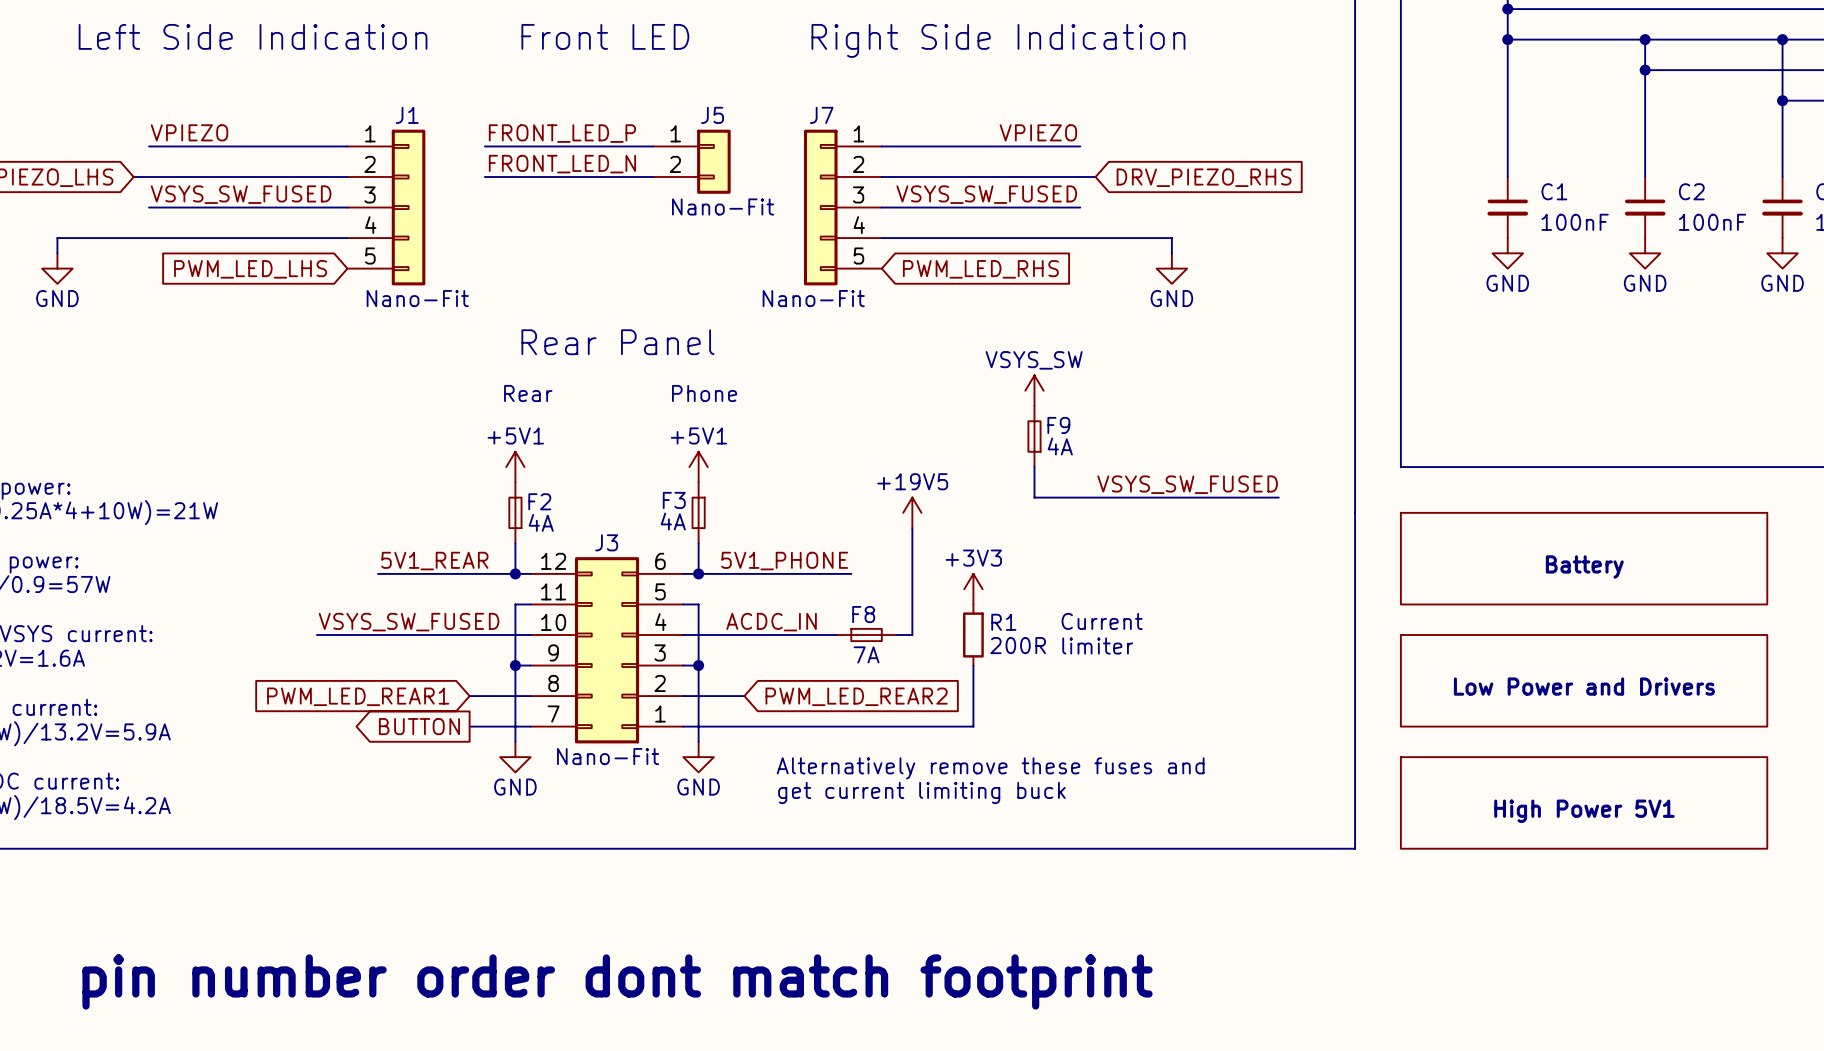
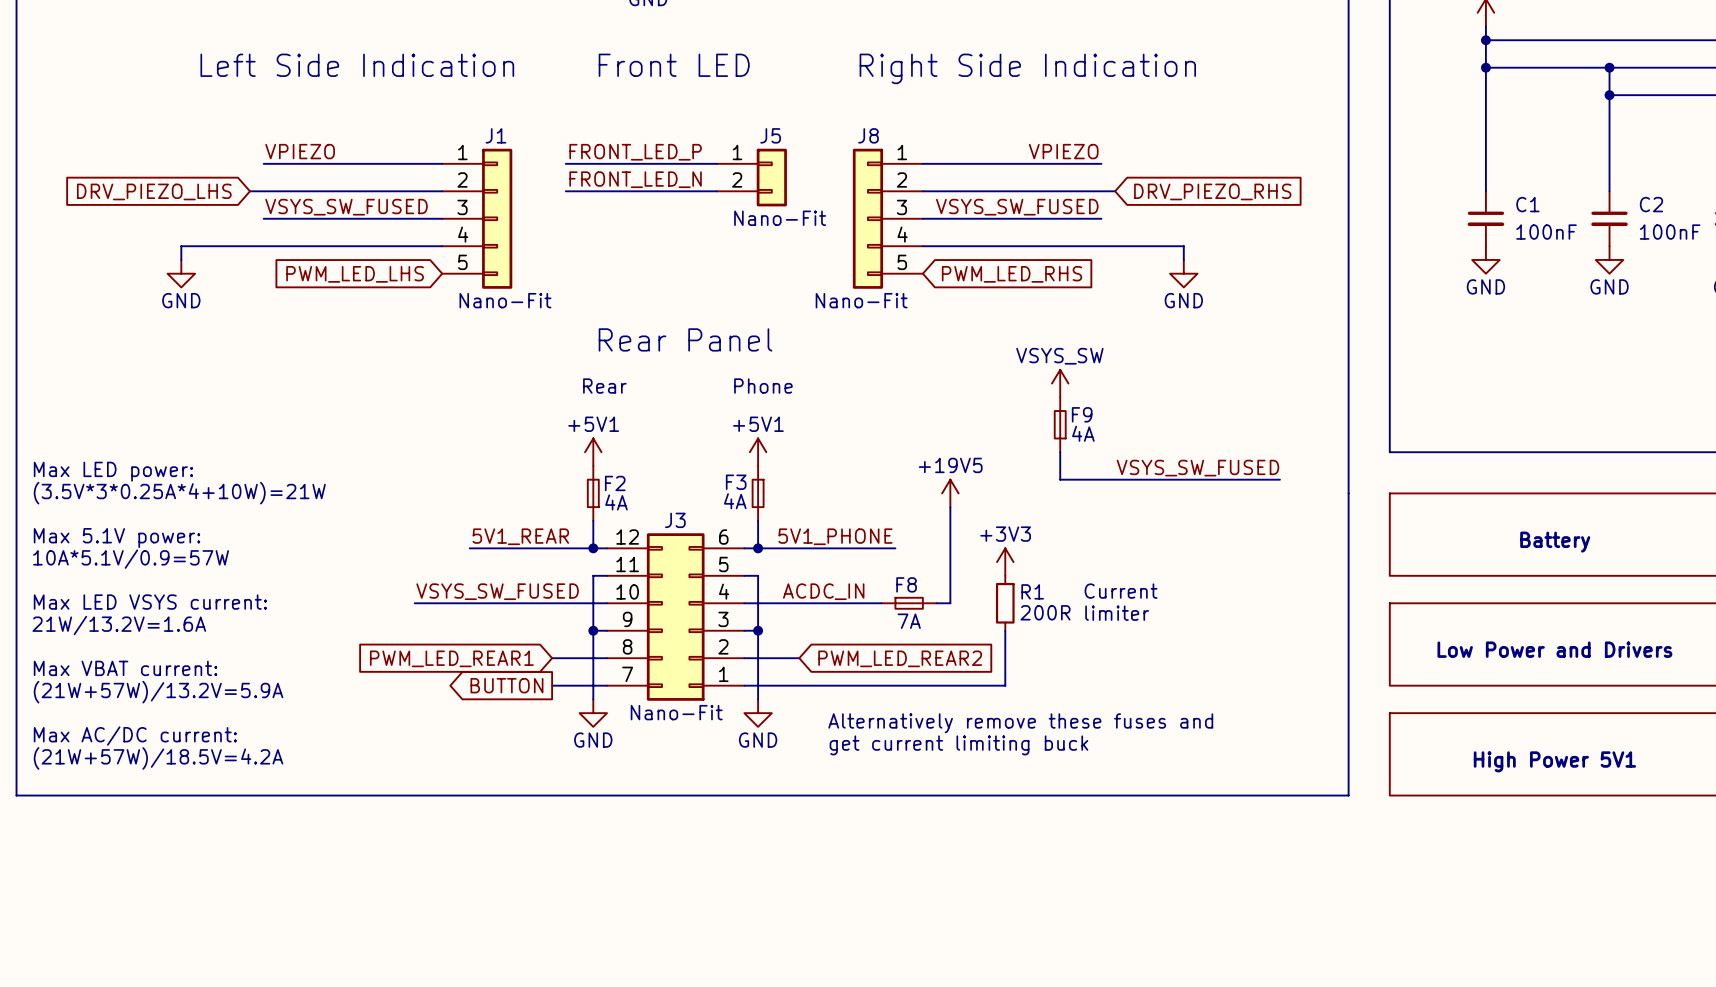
J7 name: J7 (821, 115) -> J8 (868, 135)
text: pin number order dont match footprint (617, 981) -> none

